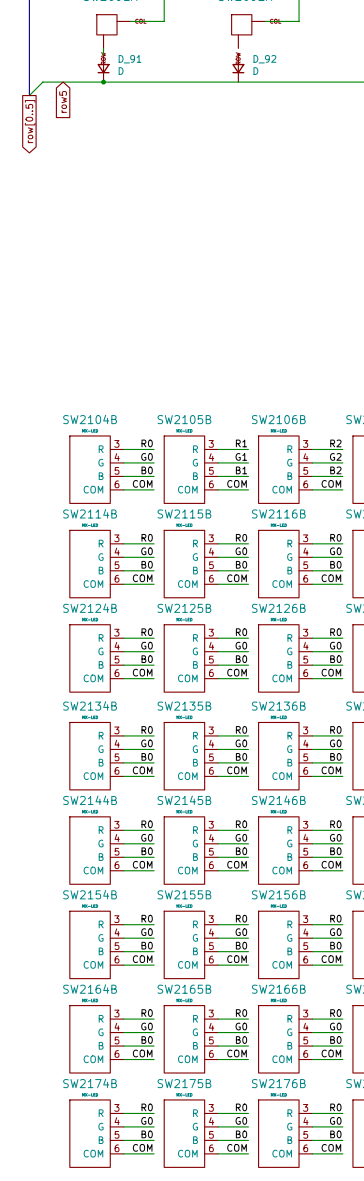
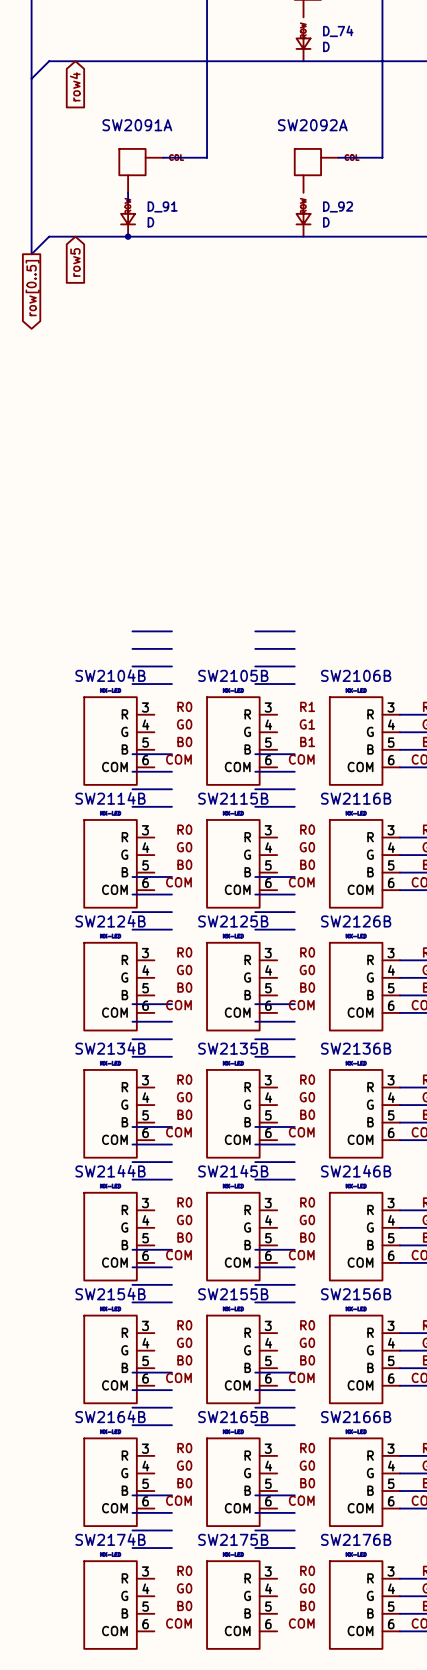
wire: (123, 449) (154, 449) -> (132, 631) (171, 631)
wire: (218, 449) (248, 449) -> (255, 631) (294, 631)
wire: (123, 462) (154, 462) -> (132, 648) (171, 648)
wire: (218, 462) (248, 462) -> (255, 648) (294, 648)
wire: (123, 476) (154, 476) -> (132, 666) (171, 666)
wire: (218, 476) (248, 476) -> (255, 666) (294, 666)
wire: (123, 489) (154, 489) -> (132, 684) (171, 684)
wire: (218, 489) (248, 489) -> (255, 684) (294, 684)
wire: (123, 543) (154, 543) -> (132, 754) (171, 754)
wire: (218, 543) (248, 543) -> (255, 754) (294, 754)
wire: (123, 557) (154, 557) -> (132, 771) (171, 771)
wire: (218, 557) (248, 557) -> (255, 771) (294, 771)
wire: (123, 570) (154, 570) -> (132, 789) (171, 789)
wire: (218, 570) (248, 570) -> (255, 789) (294, 789)
wire: (123, 584) (154, 584) -> (132, 806) (171, 806)
wire: (218, 584) (248, 584) -> (255, 806) (294, 806)
wire: (123, 638) (154, 638) -> (132, 877) (171, 877)
wire: (218, 638) (248, 638) -> (255, 877) (294, 877)
wire: (123, 651) (154, 651) -> (132, 894) (171, 894)
wire: (218, 651) (248, 651) -> (255, 894) (294, 894)
wire: (123, 665) (154, 665) -> (132, 912) (171, 912)
wire: (218, 665) (248, 665) -> (255, 912) (294, 912)
wire: (123, 678) (154, 678) -> (132, 929) (171, 929)
wire: (218, 678) (248, 678) -> (255, 929) (294, 929)
wire: (123, 735) (154, 735) -> (132, 1004) (171, 1004)
wire: (218, 735) (248, 735) -> (255, 1004) (294, 1004)
wire: (123, 749) (154, 749) -> (132, 1021) (171, 1021)
wire: (218, 749) (248, 749) -> (255, 1021) (294, 1021)
wire: (123, 762) (154, 762) -> (132, 1039) (171, 1039)
wire: (218, 762) (248, 762) -> (255, 1039) (294, 1039)
wire: (123, 776) (154, 776) -> (132, 1056) (171, 1056)
wire: (218, 776) (248, 776) -> (255, 1056) (294, 1056)
wire: (123, 830) (154, 830) -> (132, 1126) (171, 1126)
wire: (218, 830) (248, 830) -> (255, 1126) (294, 1126)
wire: (123, 843) (154, 843) -> (132, 1144) (171, 1144)
wire: (218, 843) (248, 843) -> (255, 1144) (294, 1144)
wire: (123, 857) (154, 857) -> (132, 1162) (171, 1162)
wire: (218, 857) (248, 857) -> (255, 1162) (294, 1162)
wire: (123, 870) (154, 870) -> (132, 1179) (171, 1179)
wire: (218, 870) (248, 870) -> (255, 1179) (294, 1179)
wire: (123, 924) (154, 924) -> (132, 1249) (171, 1249)
wire: (218, 924) (248, 924) -> (255, 1249) (294, 1249)
wire: (123, 938) (154, 938) -> (132, 1267) (171, 1267)
wire: (218, 938) (248, 938) -> (255, 1267) (294, 1267)
wire: (123, 951) (154, 951) -> (132, 1284) (171, 1284)
wire: (218, 951) (248, 951) -> (255, 1284) (294, 1284)
wire: (123, 965) (154, 965) -> (132, 1302) (171, 1302)
wire: (218, 965) (248, 965) -> (255, 1302) (294, 1302)
wire: (123, 1019) (154, 1019) -> (132, 1372) (171, 1372)
wire: (218, 1019) (248, 1019) -> (255, 1372) (294, 1372)
wire: (123, 1032) (154, 1032) -> (132, 1390) (171, 1390)
wire: (218, 1032) (248, 1032) -> (255, 1390) (294, 1390)
wire: (123, 1046) (154, 1046) -> (132, 1407) (171, 1407)
wire: (218, 1046) (248, 1046) -> (255, 1407) (294, 1407)
wire: (123, 1059) (154, 1059) -> (132, 1425) (171, 1425)
wire: (218, 1059) (248, 1059) -> (255, 1425) (294, 1425)
wire: (123, 1113) (154, 1113) -> (132, 1495) (171, 1495)
wire: (218, 1113) (248, 1113) -> (255, 1495) (294, 1495)
wire: (123, 1126) (154, 1126) -> (132, 1512) (171, 1512)
wire: (218, 1126) (248, 1126) -> (255, 1512) (294, 1512)
wire: (123, 1140) (154, 1140) -> (132, 1530) (171, 1530)
wire: (218, 1140) (248, 1140) -> (255, 1530) (294, 1530)
wire: (123, 1153) (154, 1153) -> (132, 1548) (171, 1548)
wire: (218, 1153) (248, 1153) -> (255, 1548) (294, 1548)

